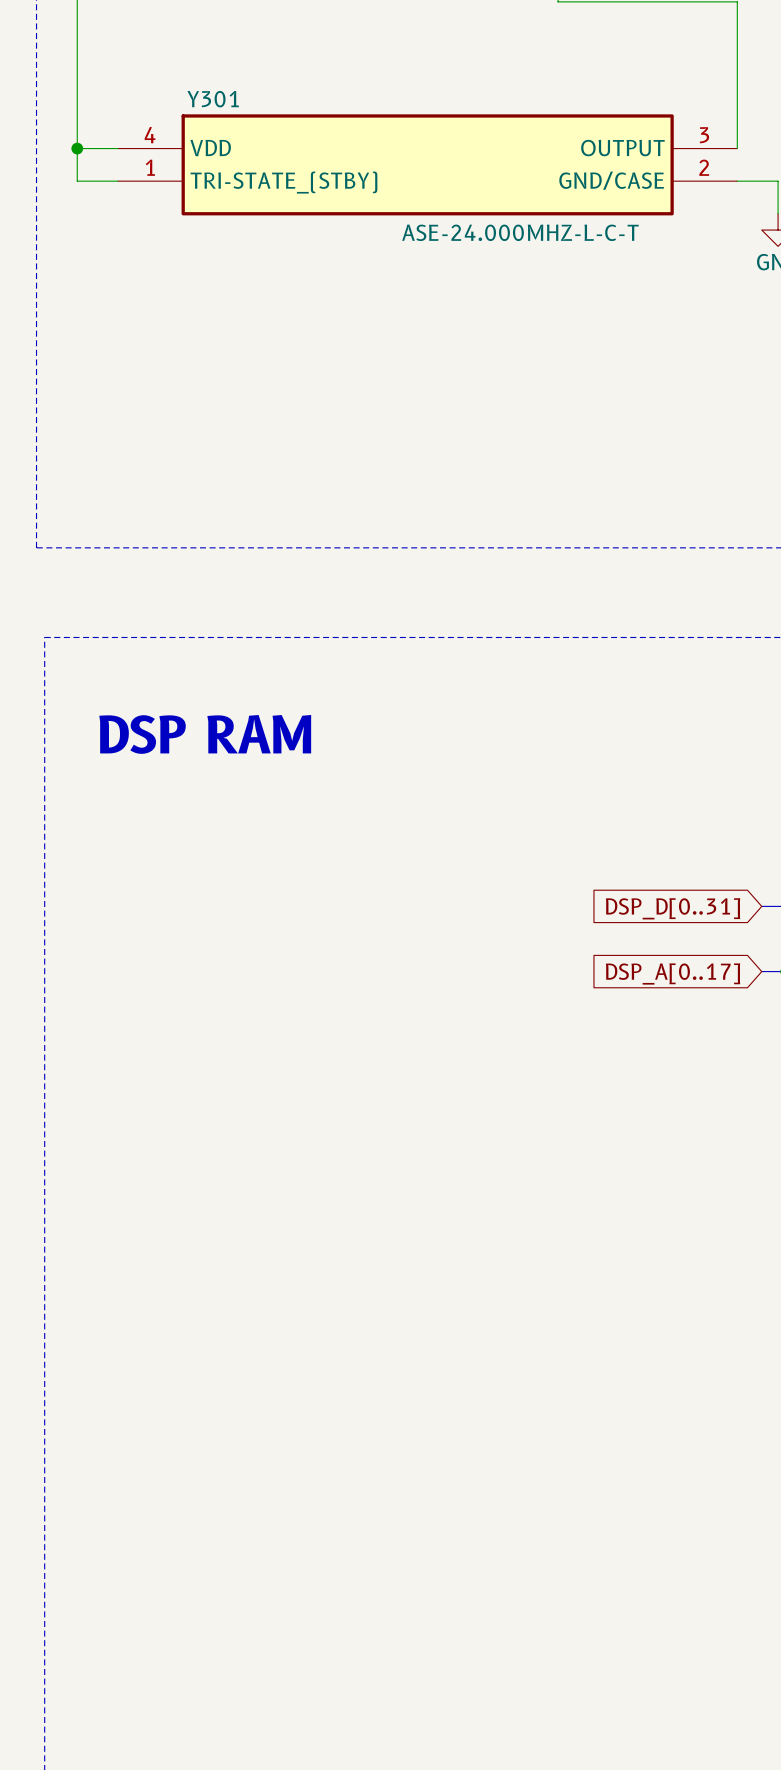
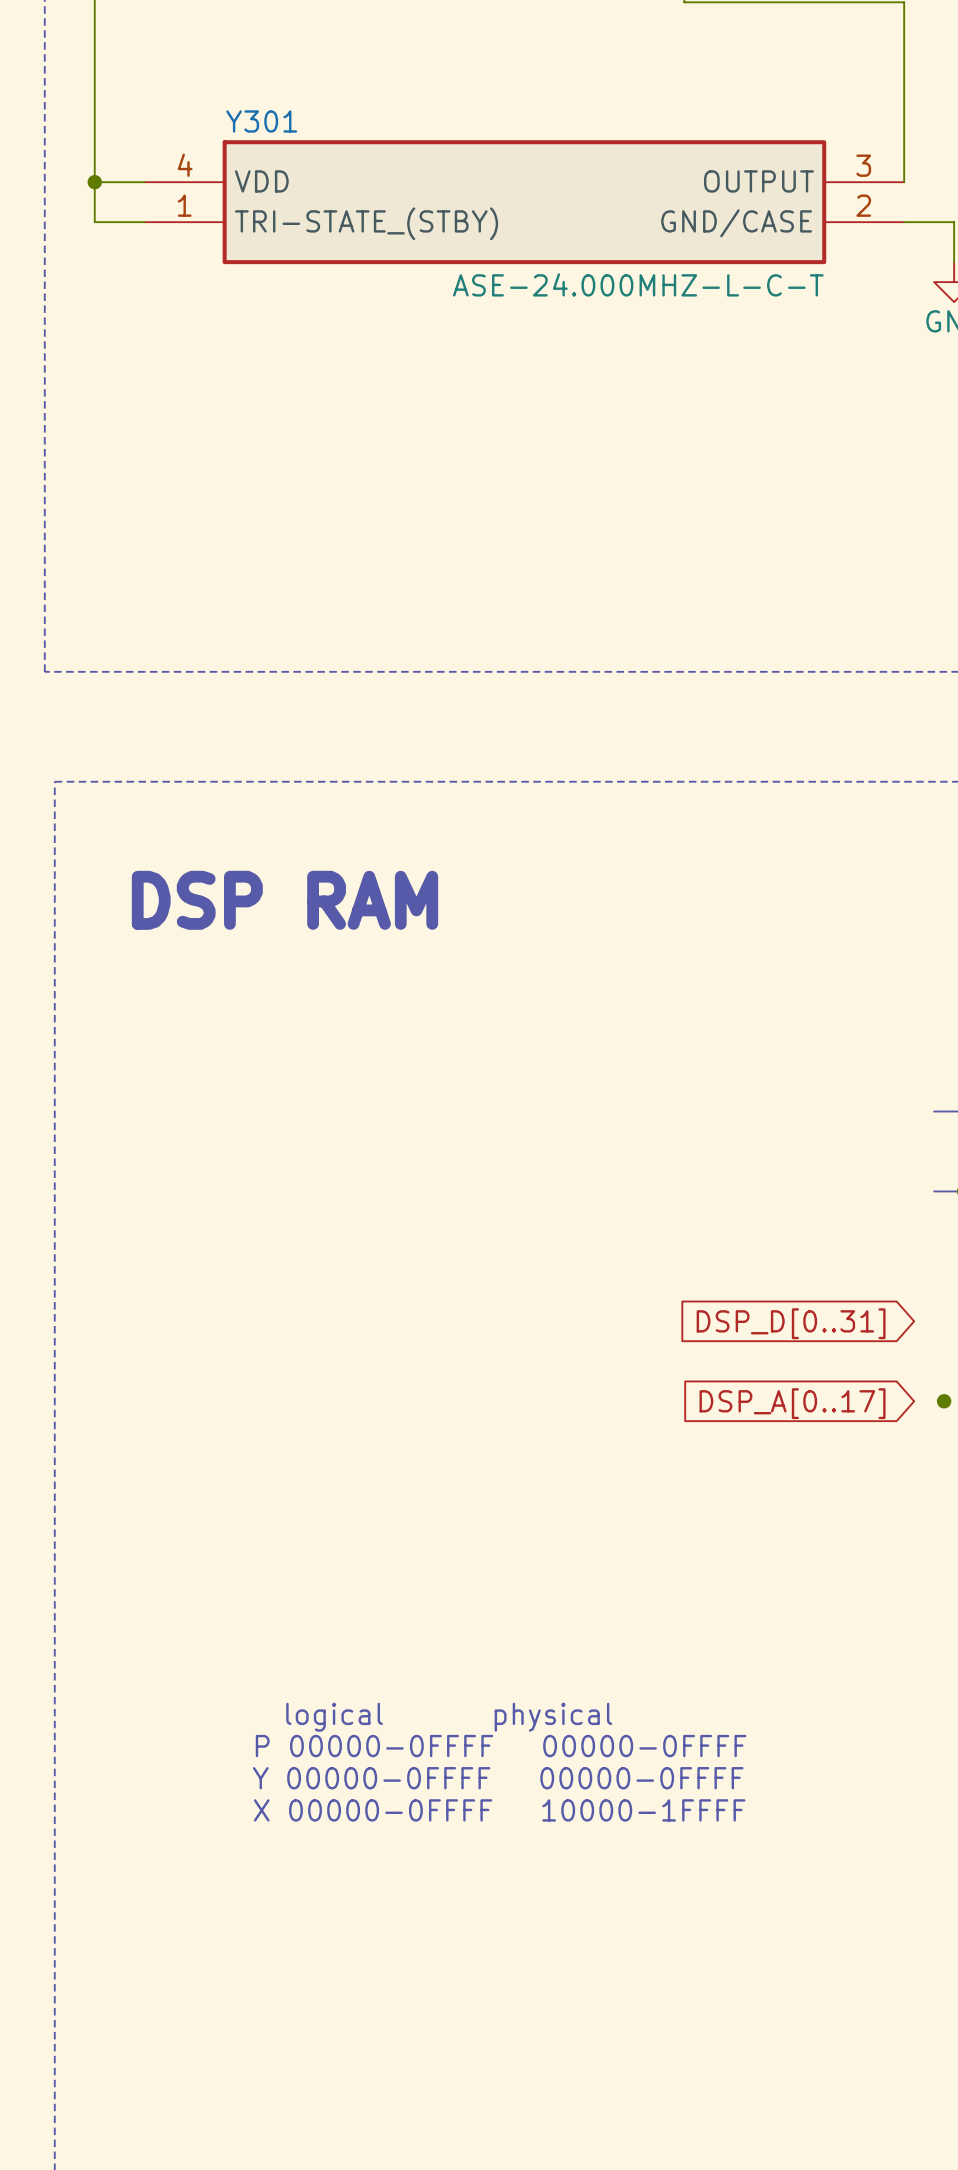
global label position: DSP_D[0..31] (673, 908) -> DSP_D[0..31] (791, 1323)
global label position: DSP_A[0..17] (673, 974) -> DSP_A[0..17] (792, 1403)
junction: none -> (944, 1401)
text: none -> logical physical (449, 1717)
text: none -> P 00000-0FFFF 00000-0FFFF (501, 1746)
text: none -> Y 00000-0FFFF 00000-0FFFF (498, 1778)
text: none -> X 00000-0FFFF 10000-1FFFF (499, 1810)

